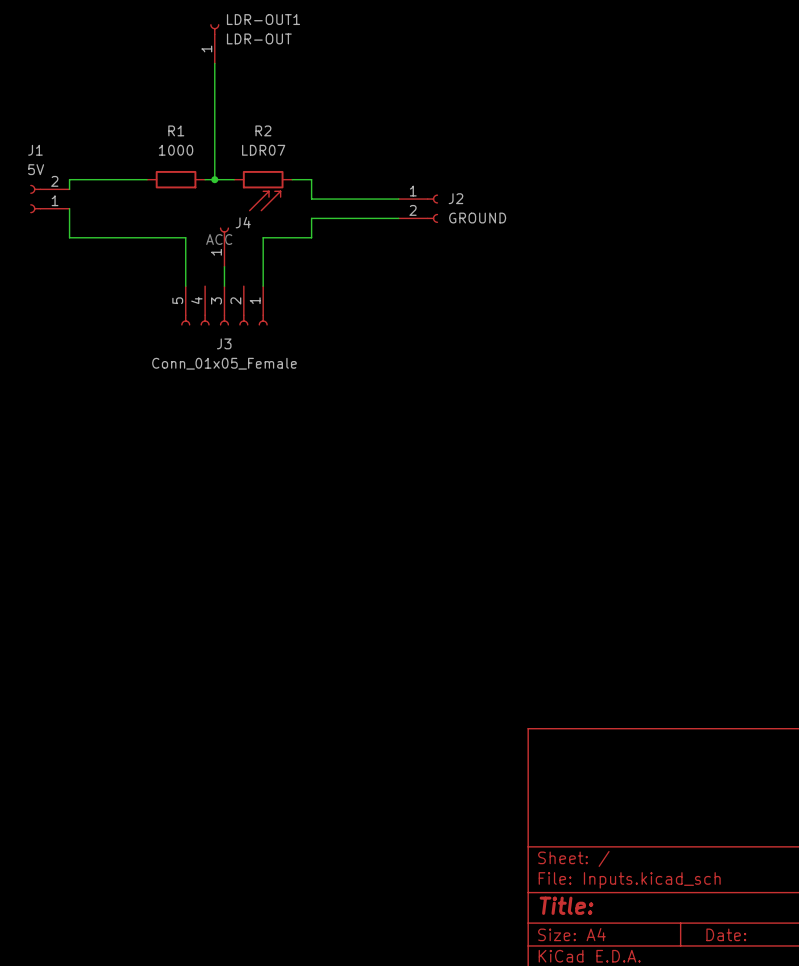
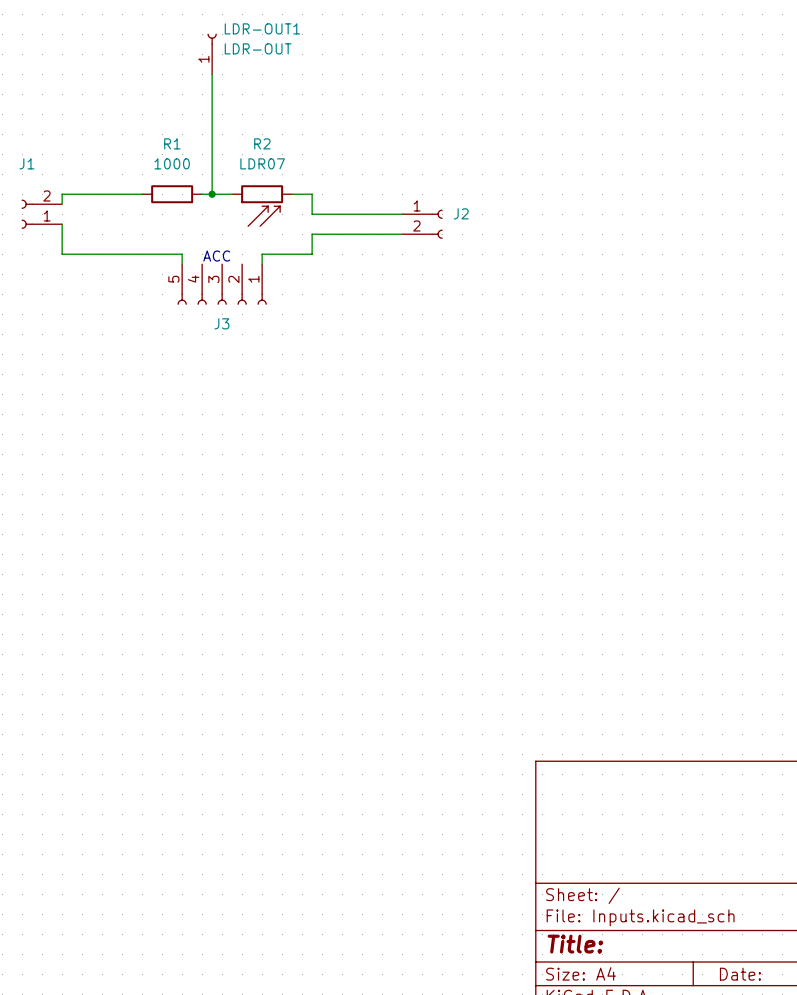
J1 value: 5V (36, 169) -> none
J2 value: GROUND (477, 218) -> none
J4: (224, 247) -> none
J3 position: (224, 305) -> (222, 284)
J3 value: Conn_01x05_Female (224, 363) -> none

